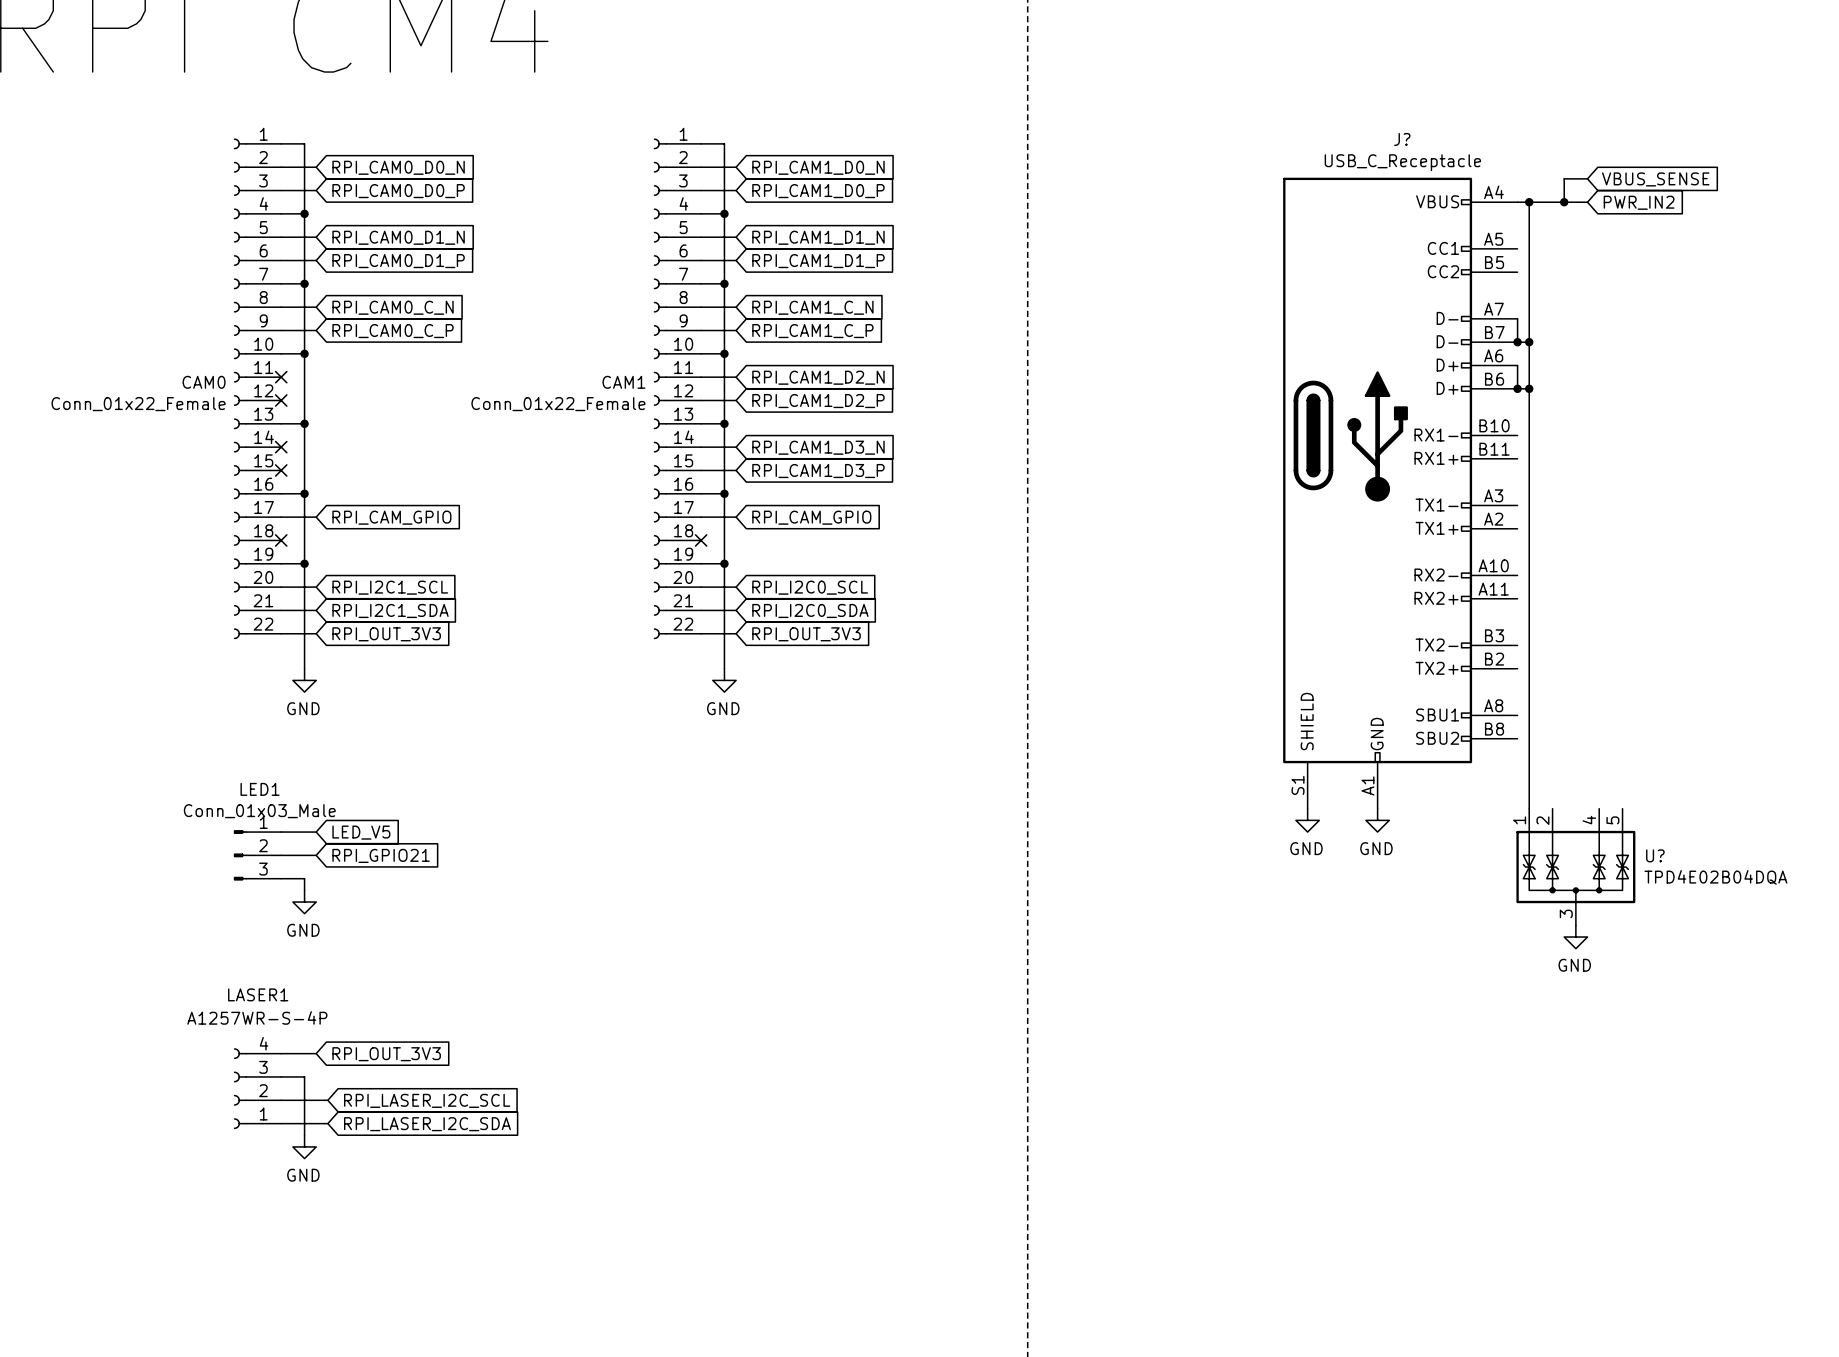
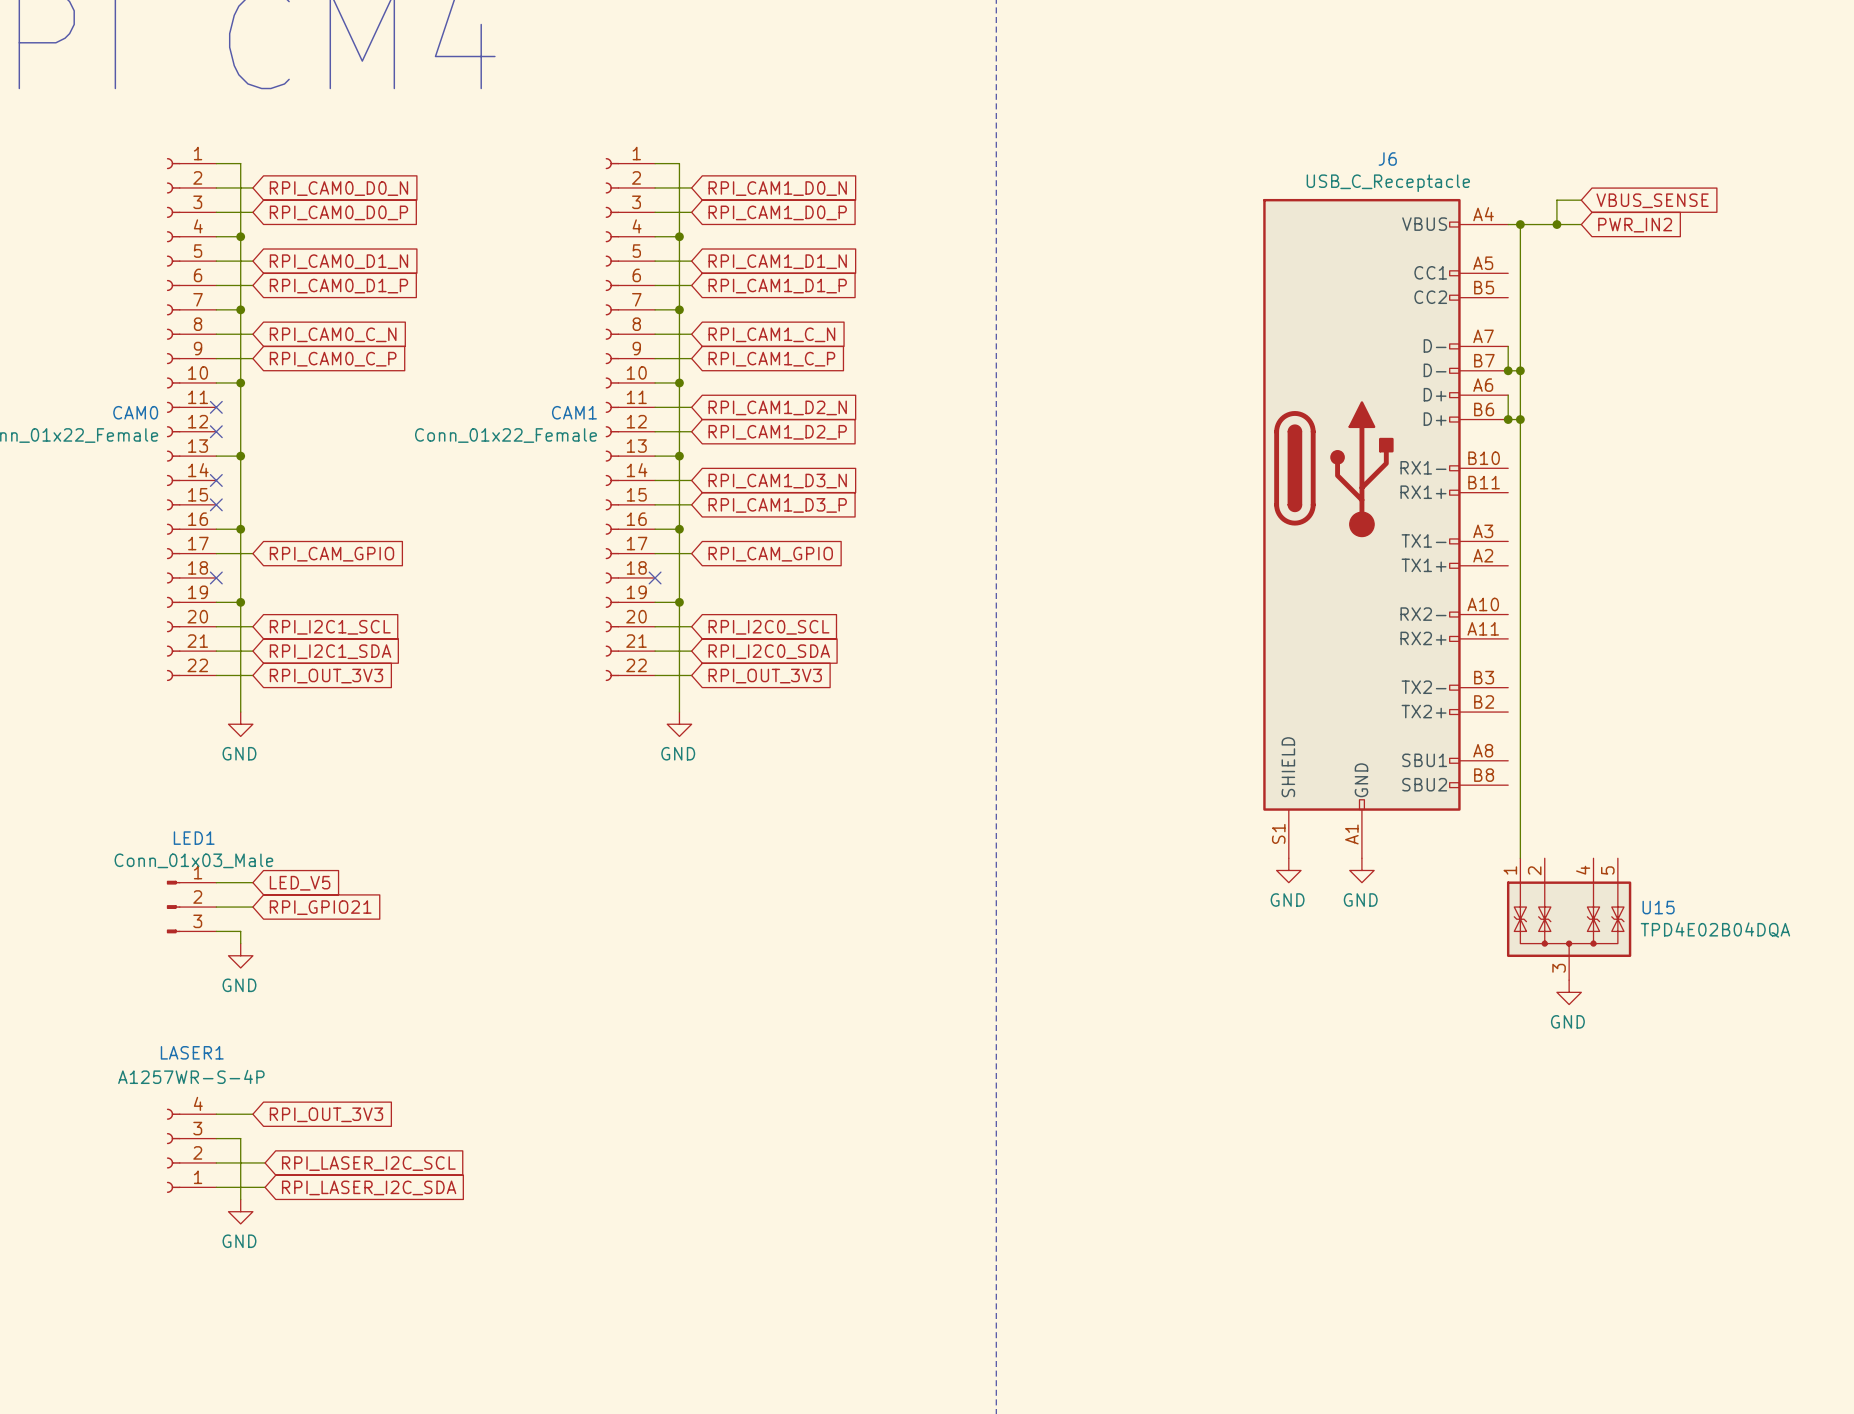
J? name: J? (1402, 139) -> J6 (1387, 159)
U? name: U? (1655, 855) -> U15 (1658, 907)

